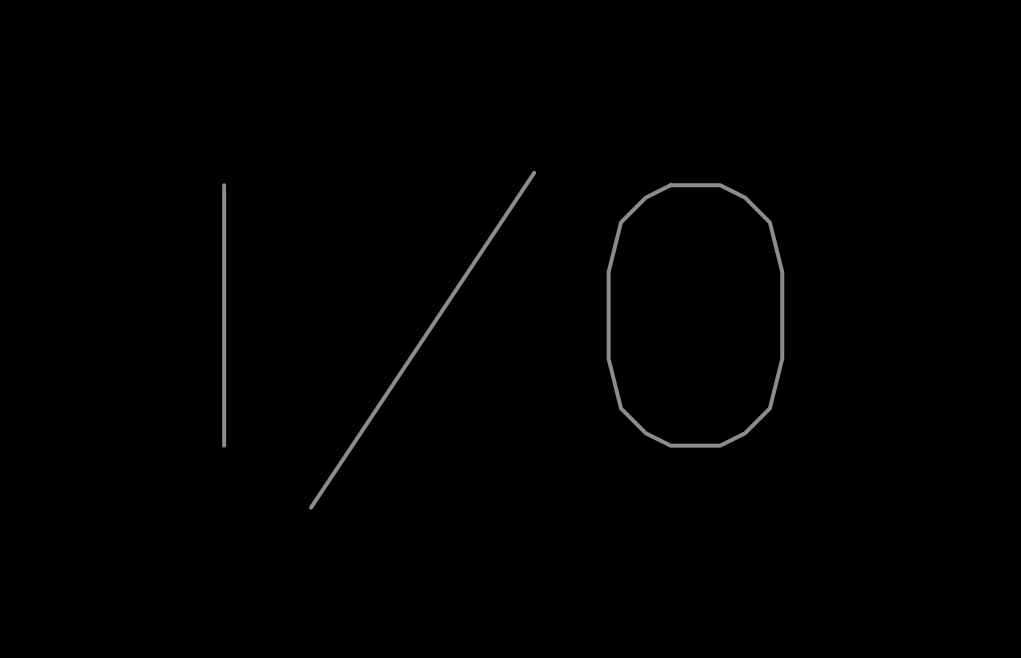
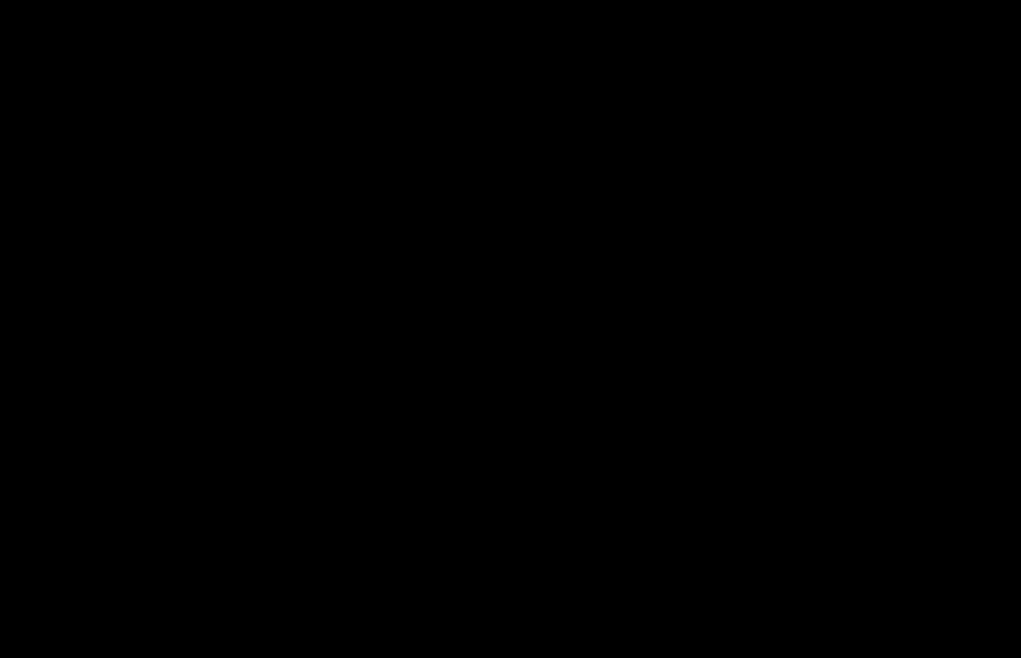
text: I/O (503, 340) -> none

